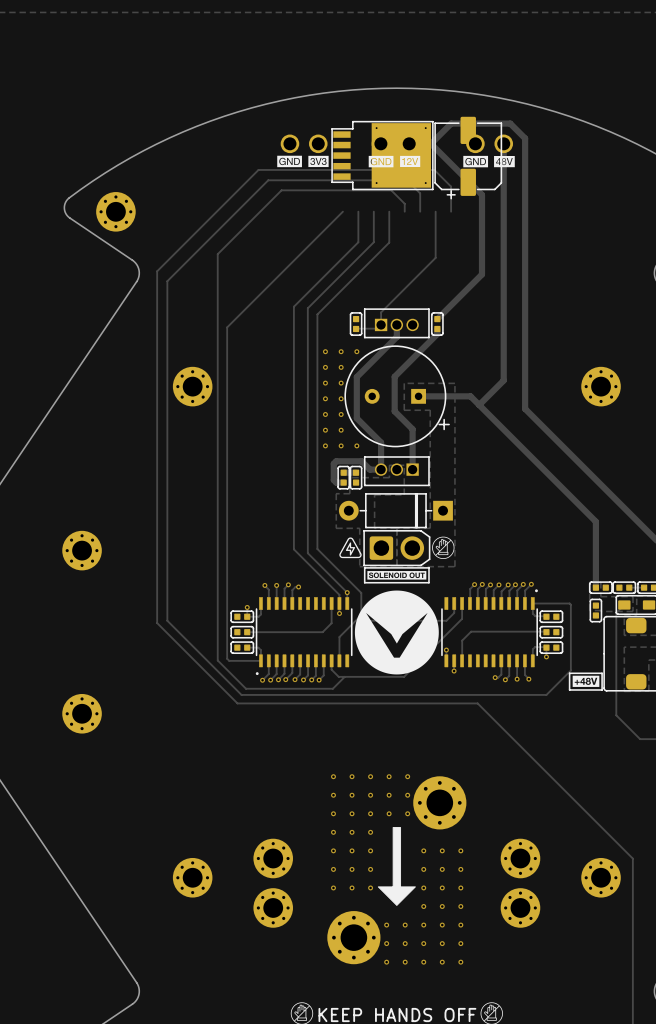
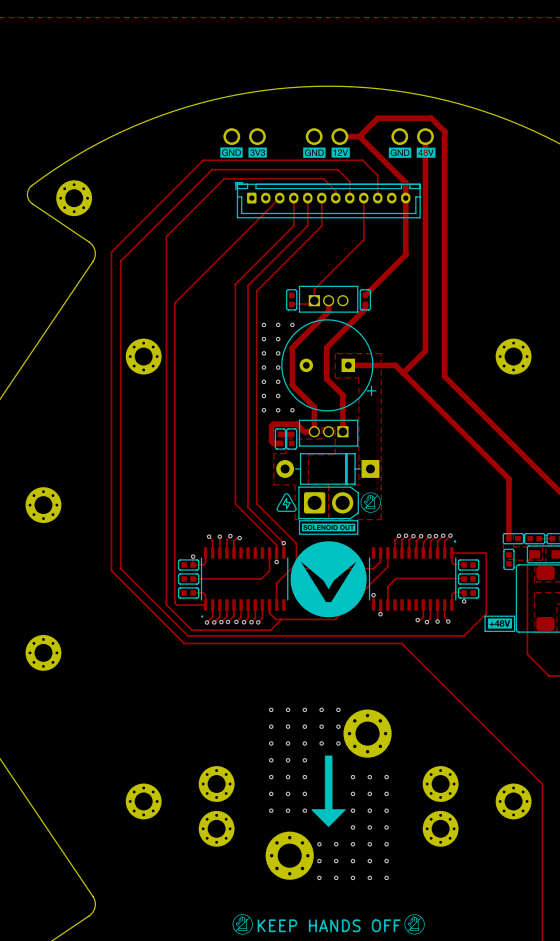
part: (382, 155) -> none
part: (468, 157) -> none
part: none -> (327, 200)

